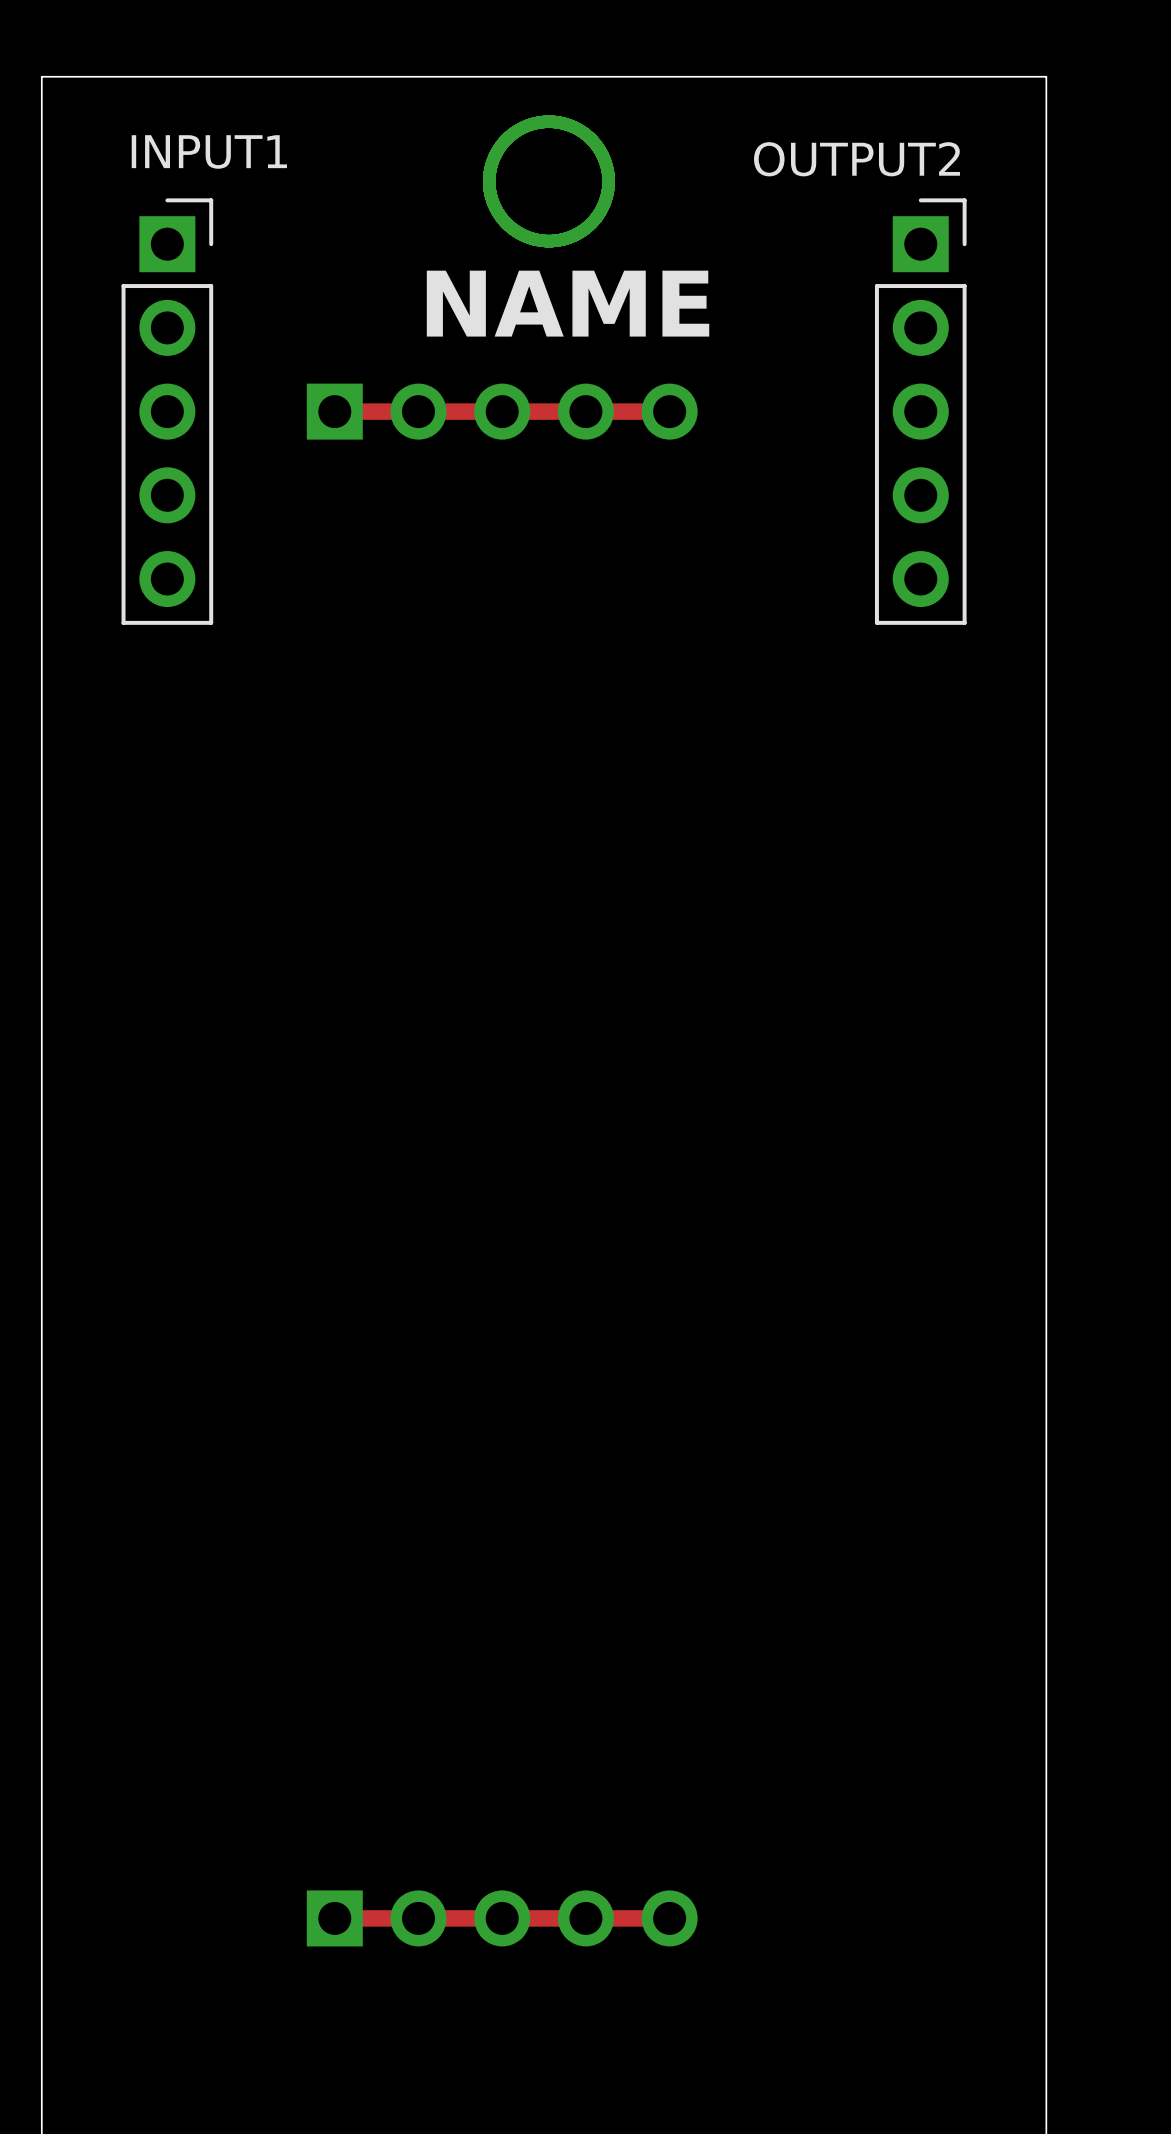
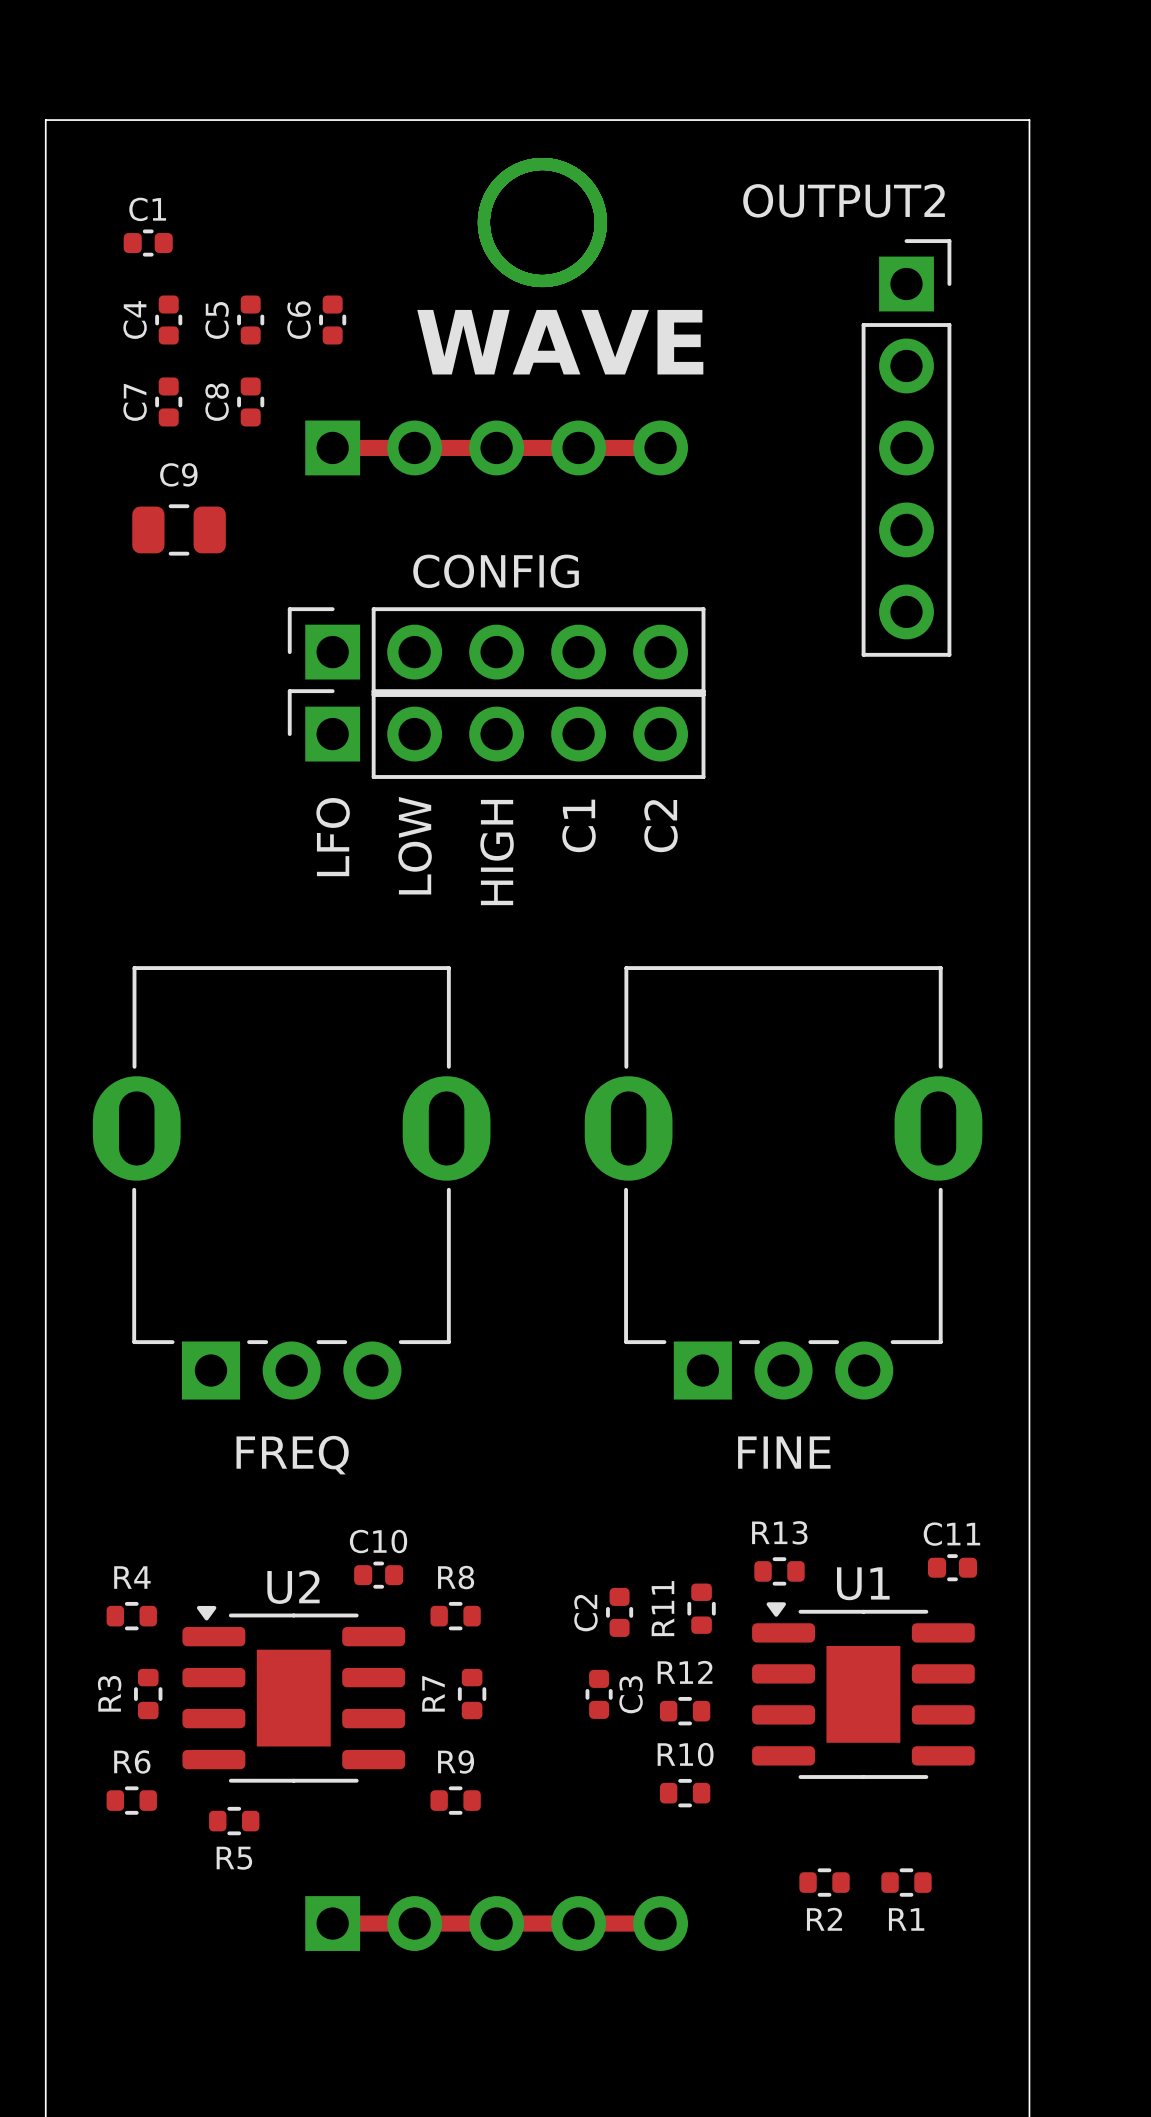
C1: none -> (148, 243)
C4: none -> (168, 319)
C5: none -> (250, 319)
C6: none -> (332, 319)
text: NAME (568, 303) -> WAVE (560, 342)
C7: none -> (168, 401)
C8: none -> (250, 401)
INPUT1: (167, 411) -> none
C9: none -> (179, 529)
text: none -> CONFIG (496, 571)
part: none -> (496, 652)
part: none -> (496, 734)
text: none -> C1 (579, 825)
text: none -> C2 (661, 826)
text: none -> LFO (333, 837)
text: none -> LOW (415, 845)
text: none -> HIGH (497, 852)
part: none -> (291, 1182)
part: none -> (783, 1182)
text: none -> FINE (784, 1452)
text: none -> FREQ (292, 1455)
C11: none -> (952, 1567)
R13: none -> (779, 1571)
C10: none -> (378, 1575)
R11: none -> (701, 1608)
C2: none -> (619, 1612)
R4: none -> (131, 1616)
R8: none -> (455, 1616)
U1: none -> (863, 1690)
R3: none -> (148, 1694)
U2: none -> (293, 1694)
R7: none -> (472, 1694)
C3: none -> (599, 1694)
R12: none -> (685, 1711)
R10: none -> (685, 1793)
R6: none -> (131, 1800)
R9: none -> (455, 1800)
R5: none -> (234, 1821)
R2: none -> (824, 1882)
R1: none -> (906, 1882)

